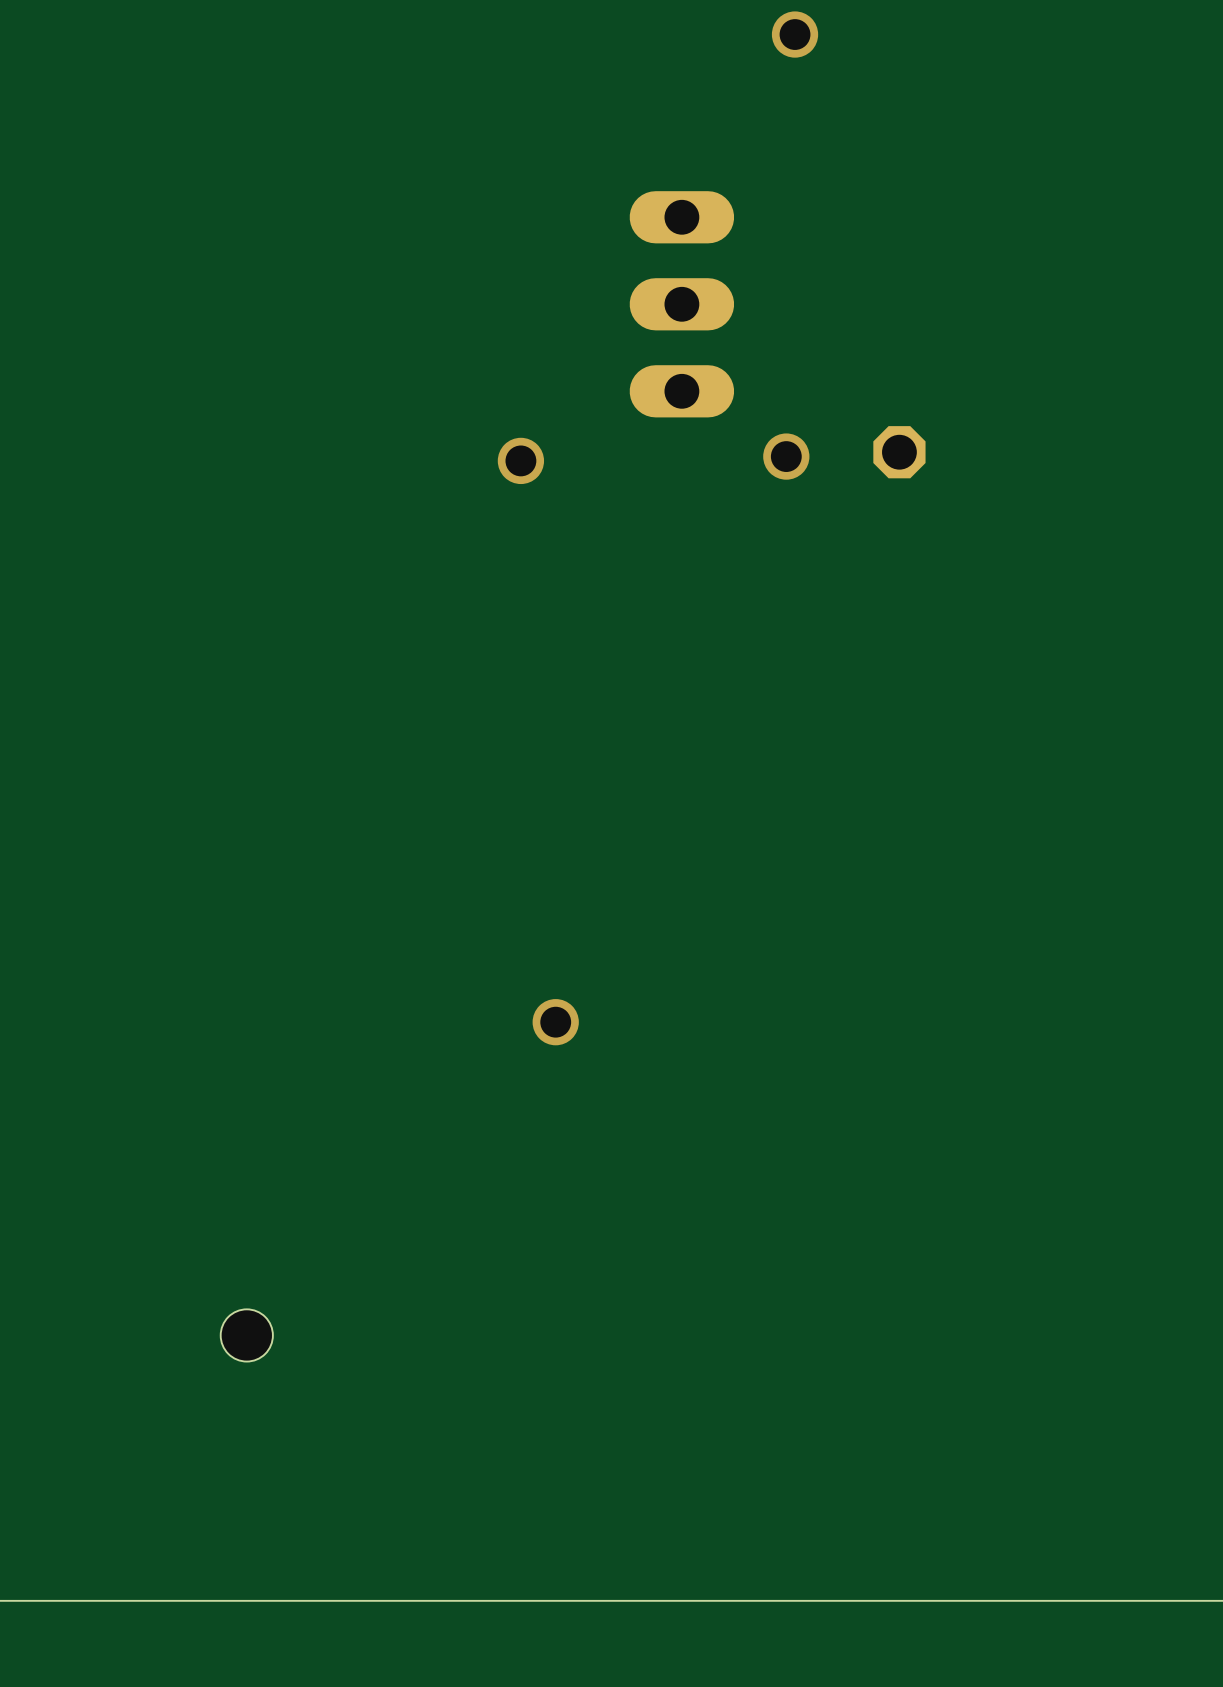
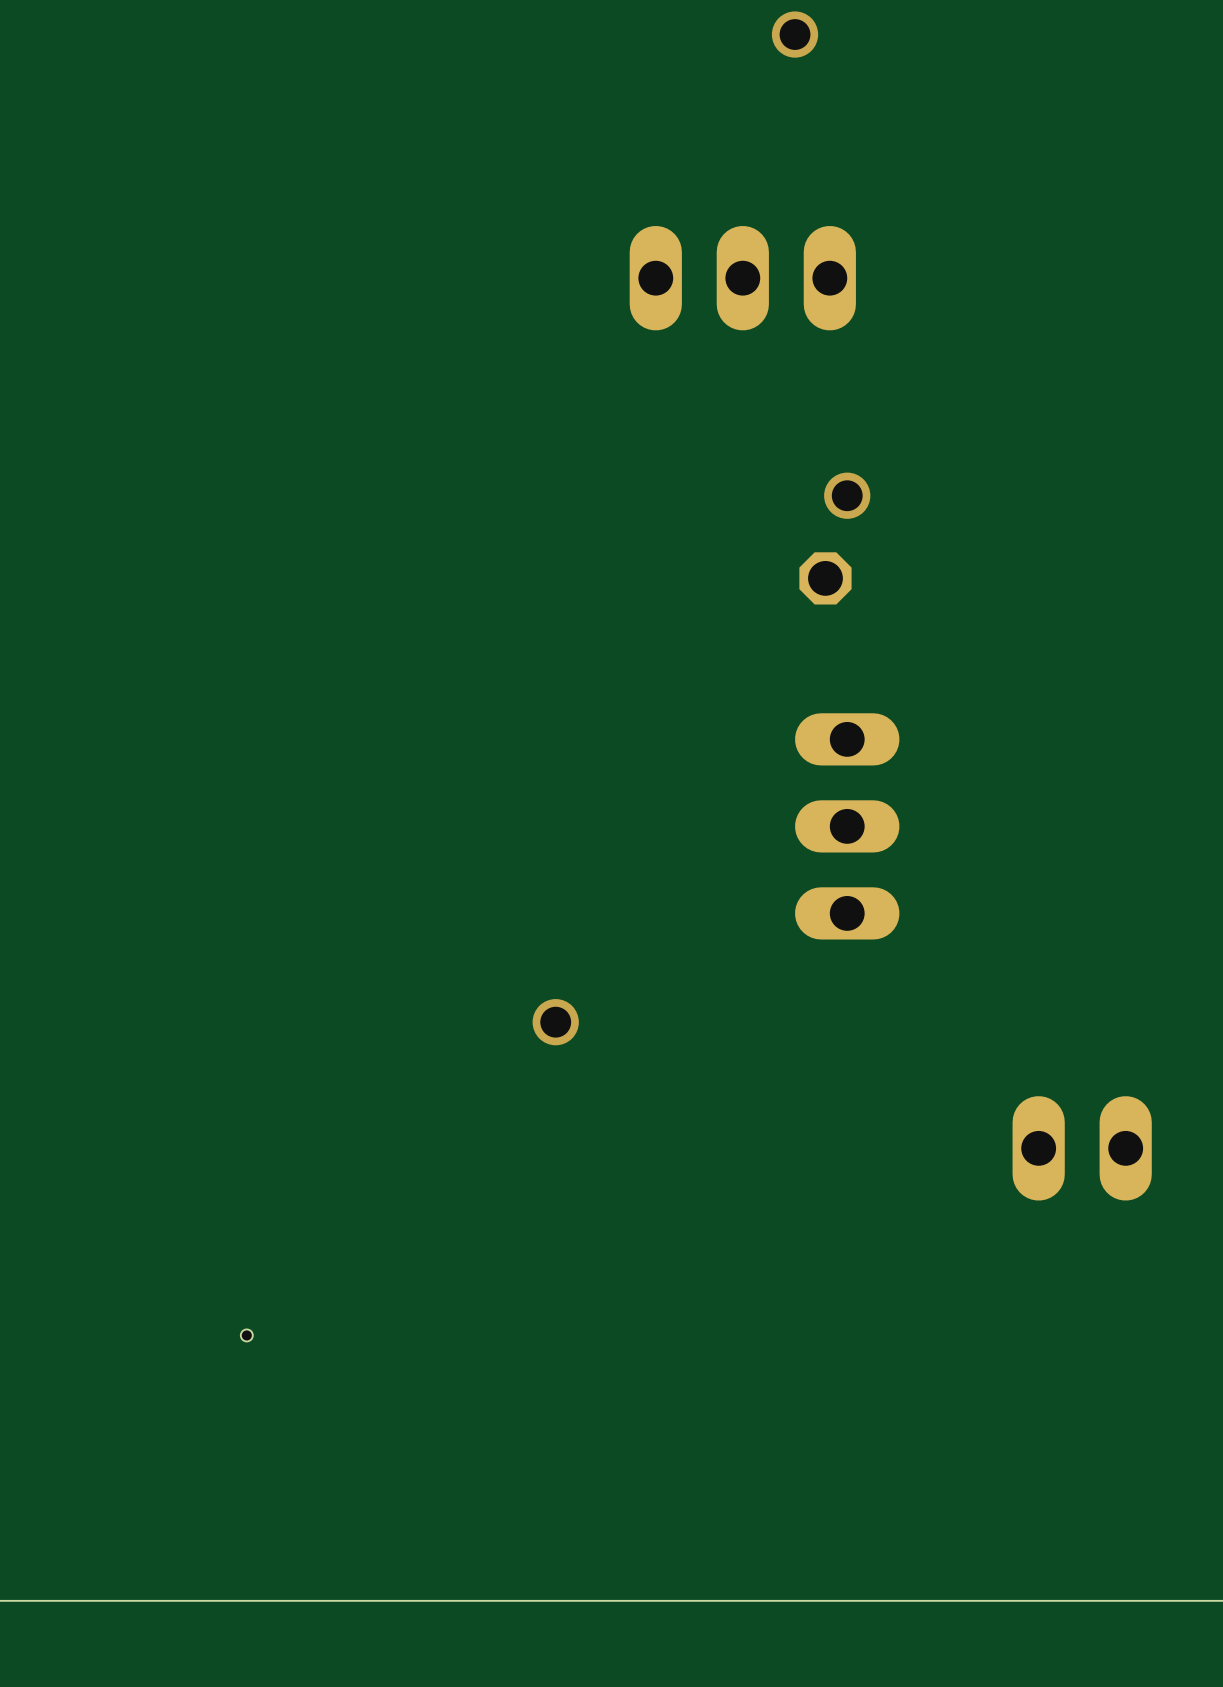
part rotation: 0° (681, 304) -> 90° clockwise (742, 278)
part position: (899, 452) -> (825, 578)
via position: (786, 456) -> (847, 495)
via: (520, 460) -> none
part: none -> (847, 826)
part: none -> (1082, 1148)
hole size: [220, 1309, 273, 1362] -> [240, 1329, 253, 1342]

